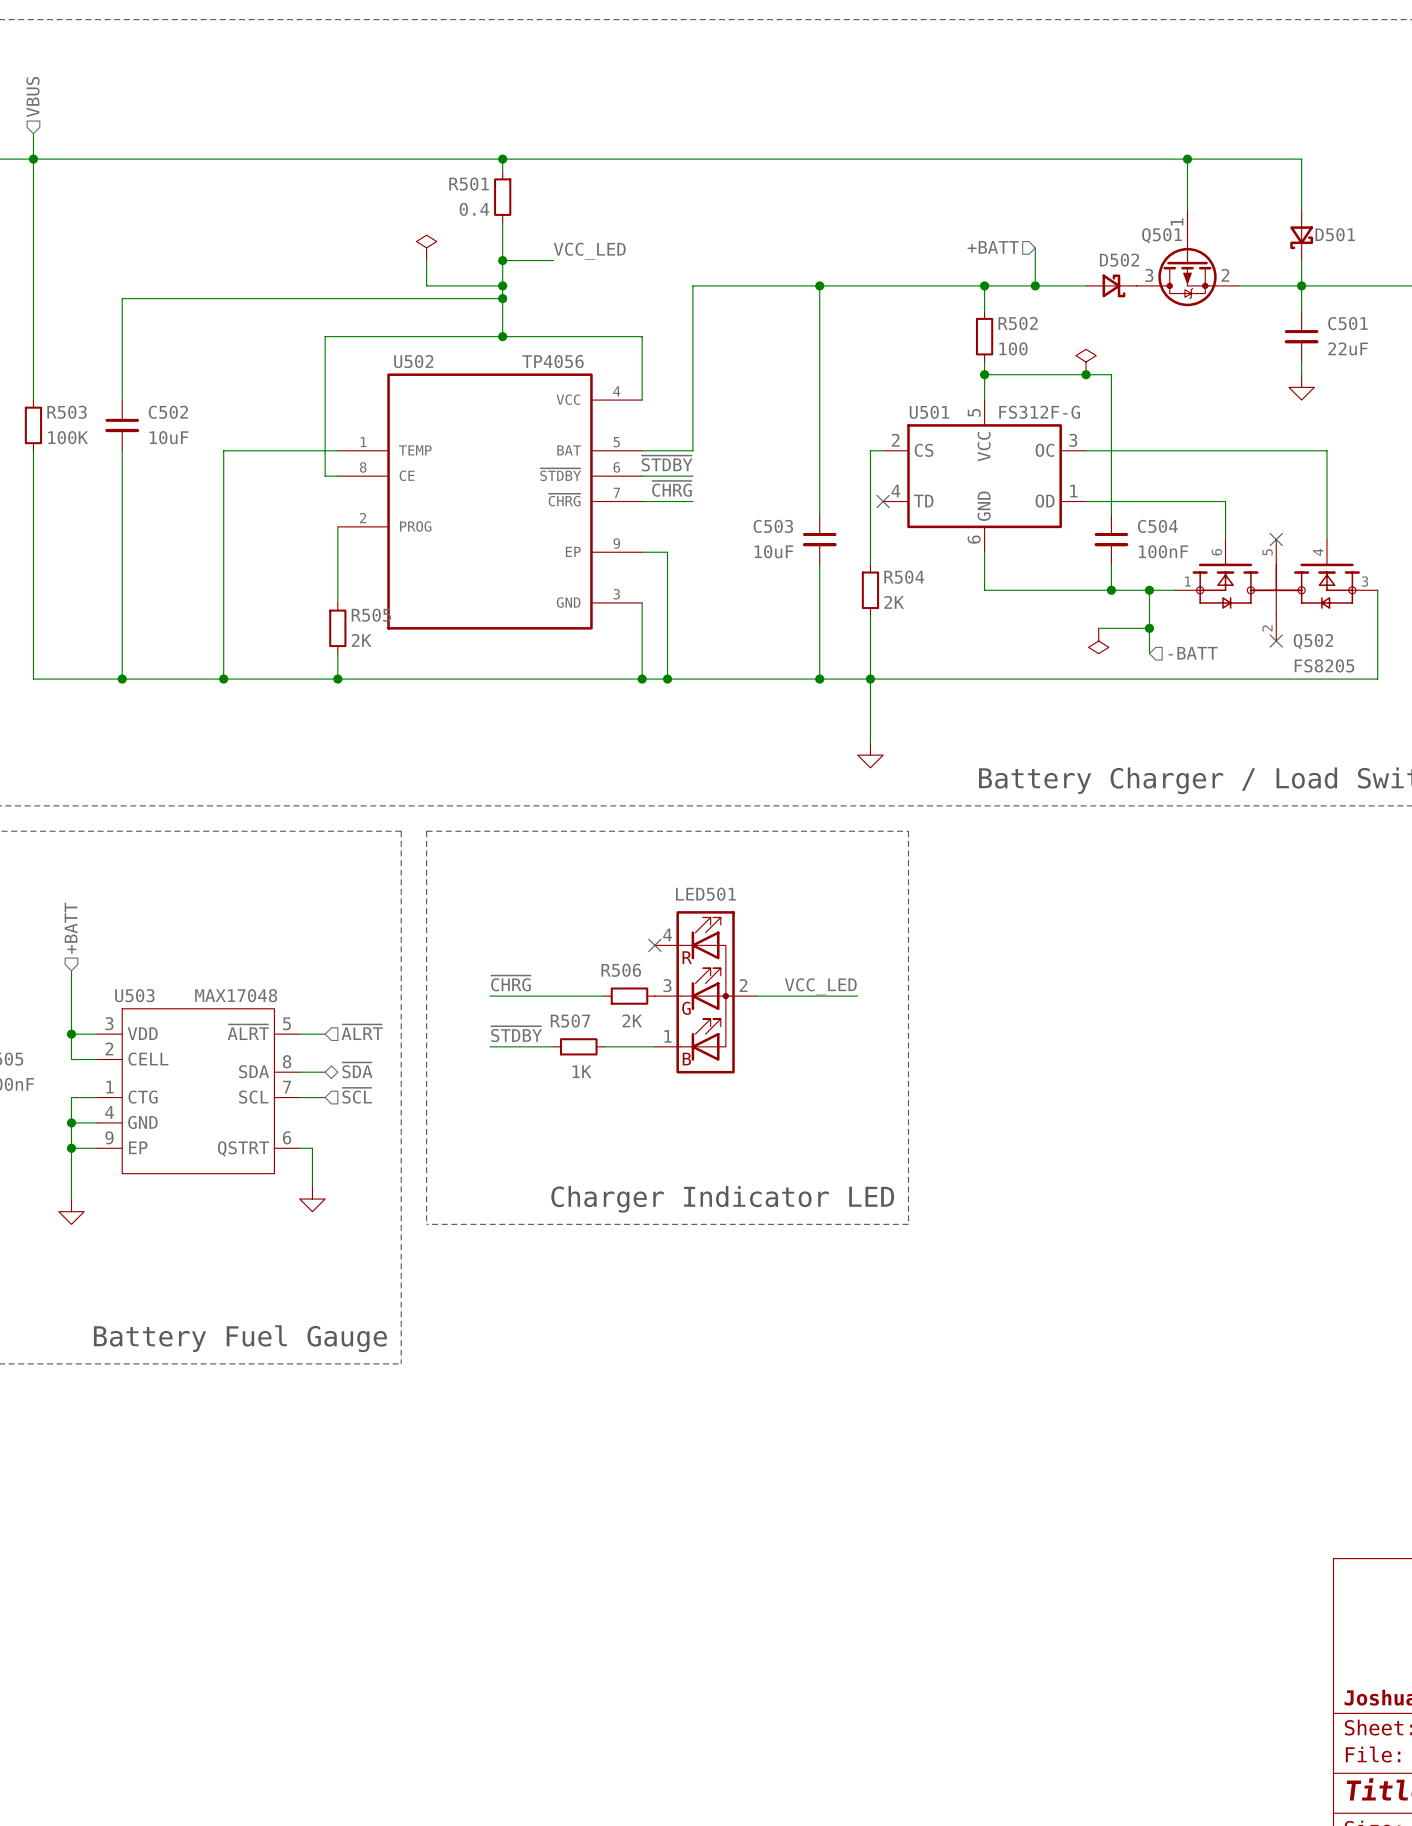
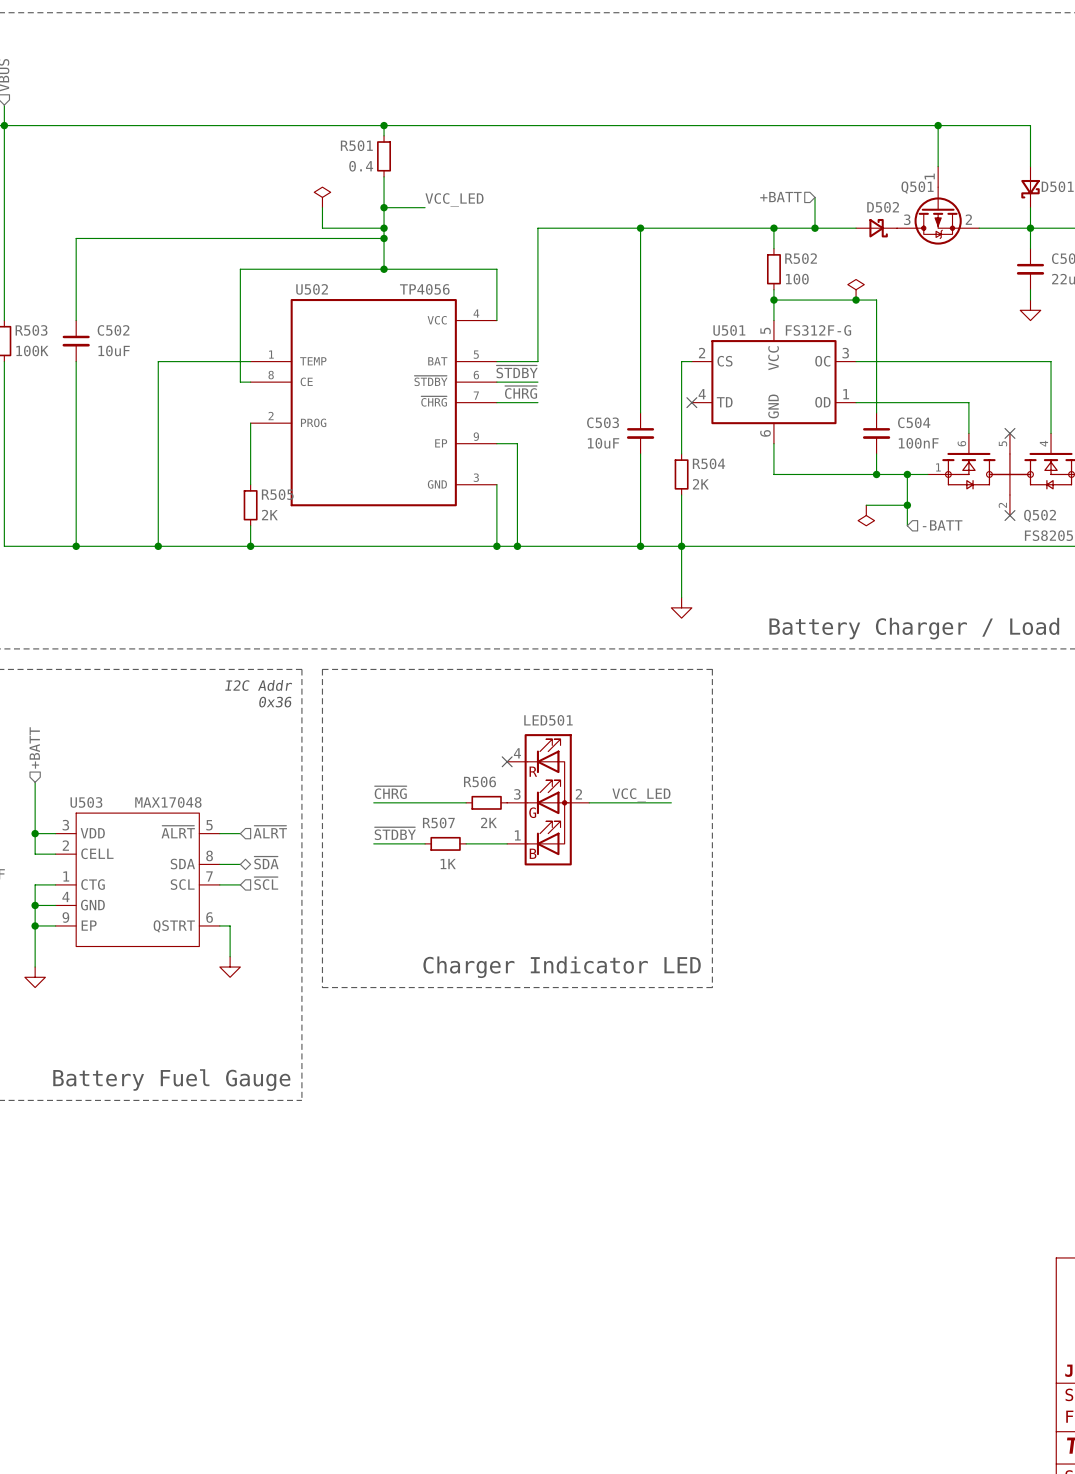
text: none -> I2C Addr (258, 685)
text: none -> 0x36 (275, 702)

